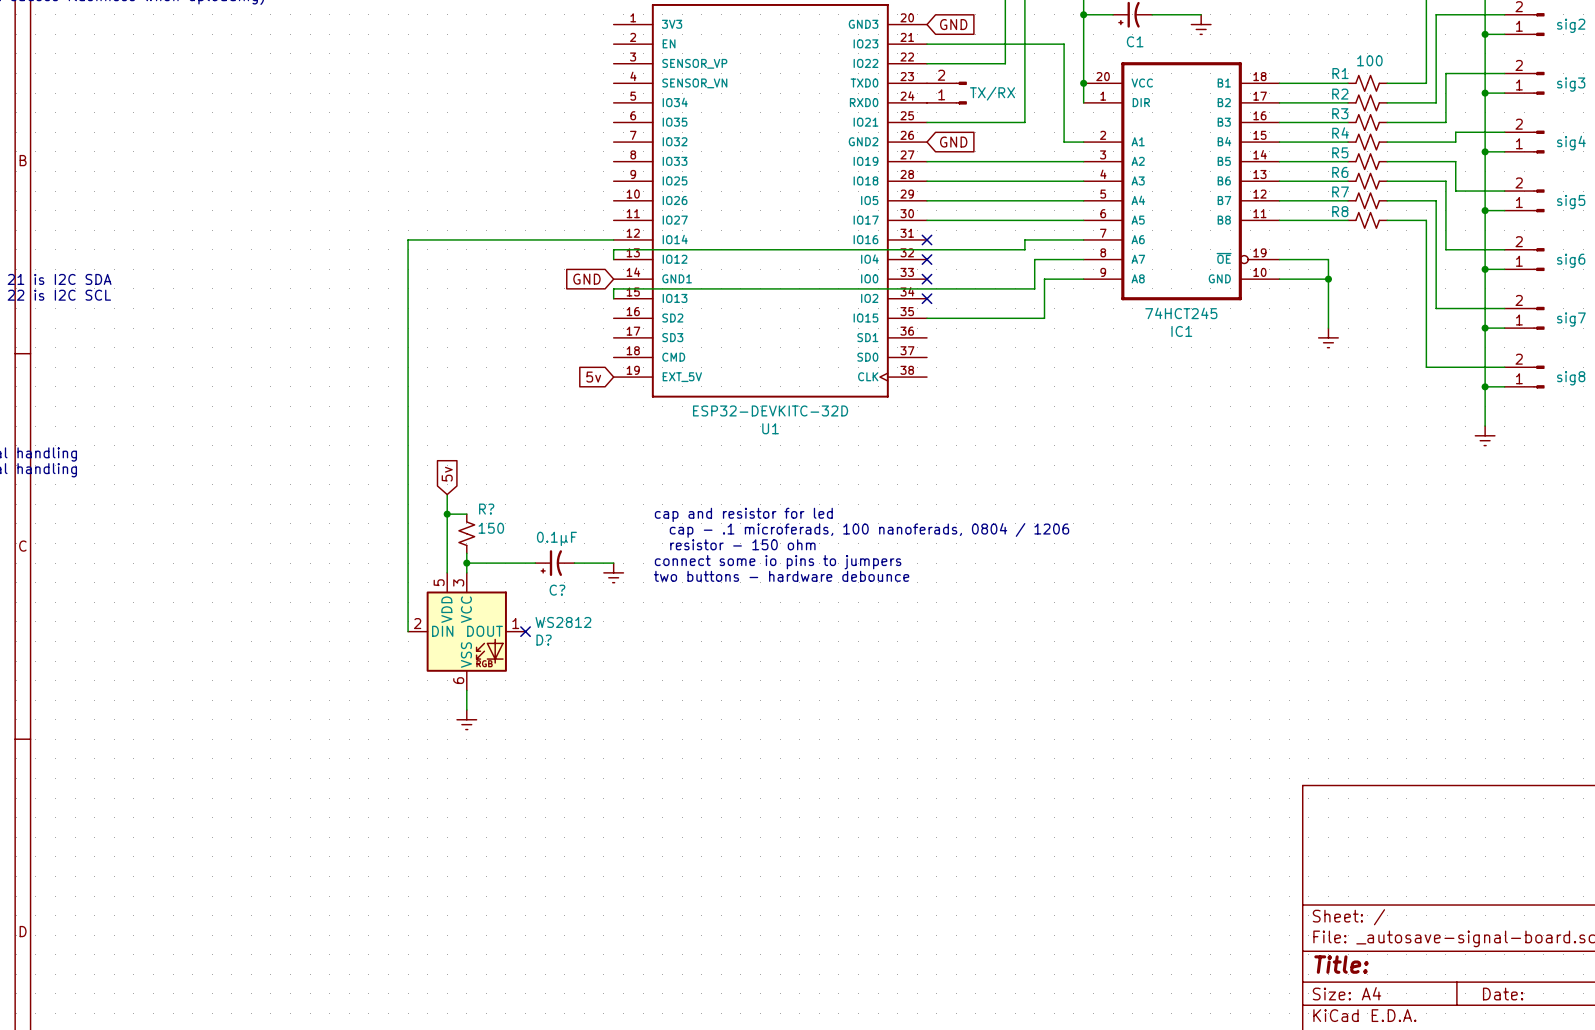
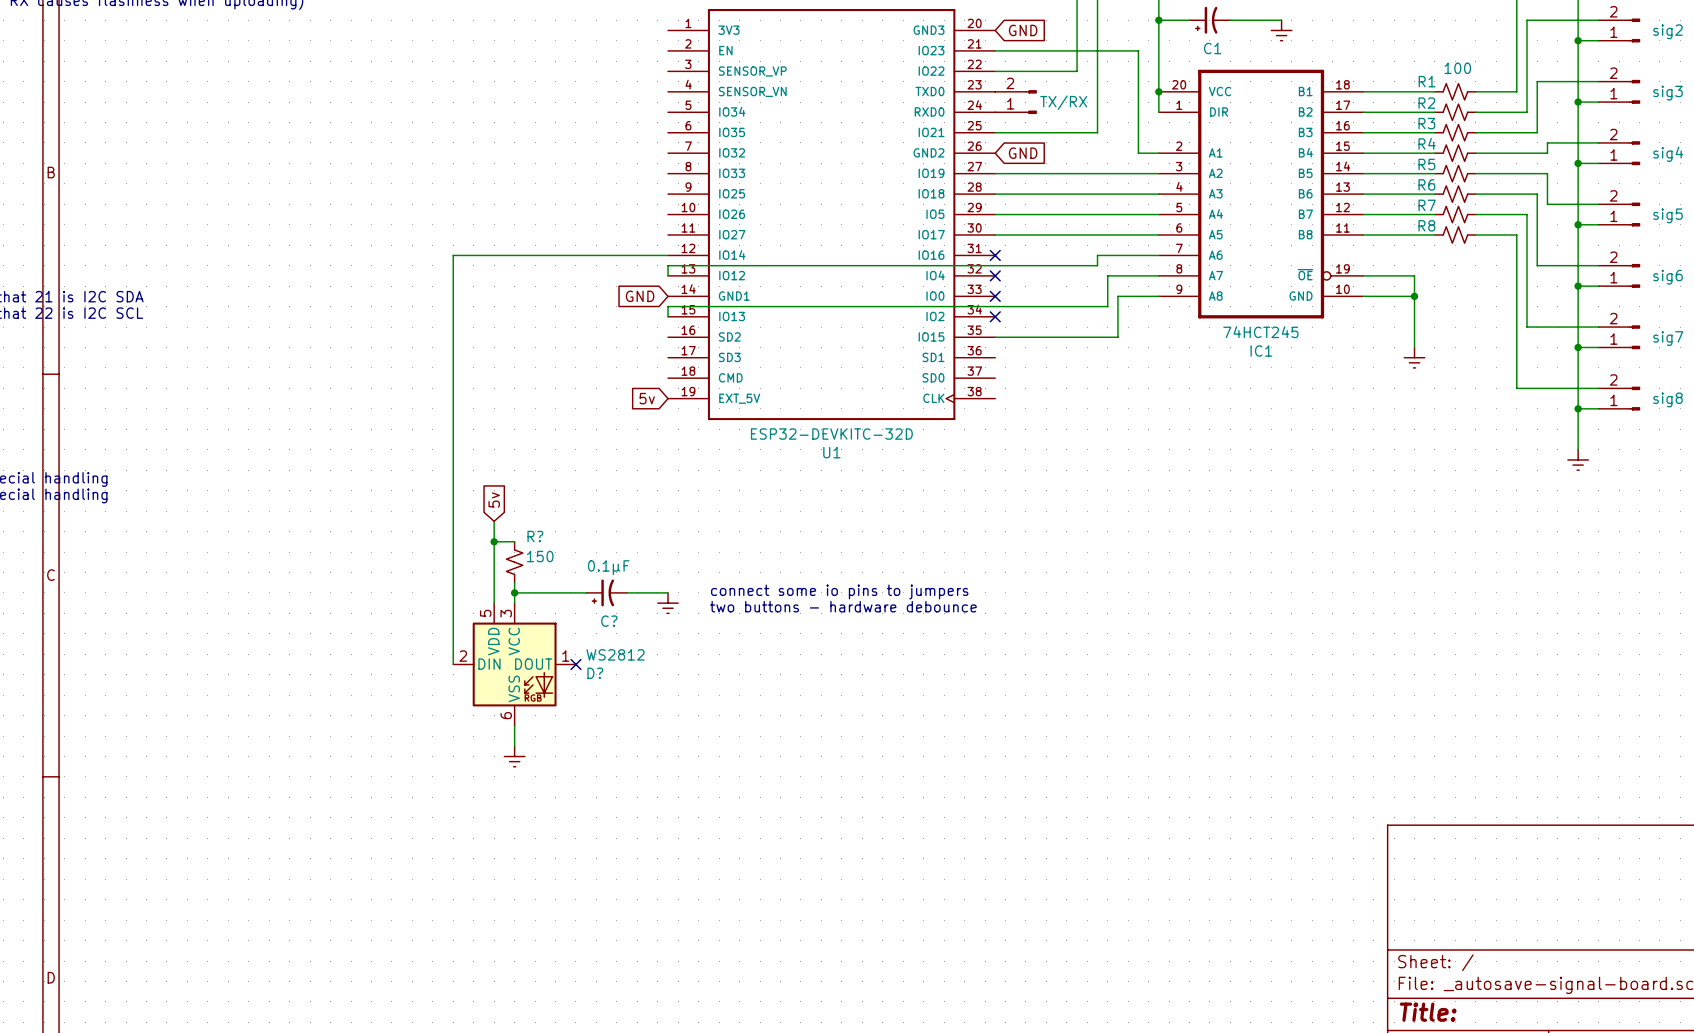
text: cap and resistor for led (743, 514) -> none
text: cap - .1 microferads, 100 nanoferads, 0804 / 1206 (869, 530) -> none
text: resistor - 150 ohm (742, 544) -> none

